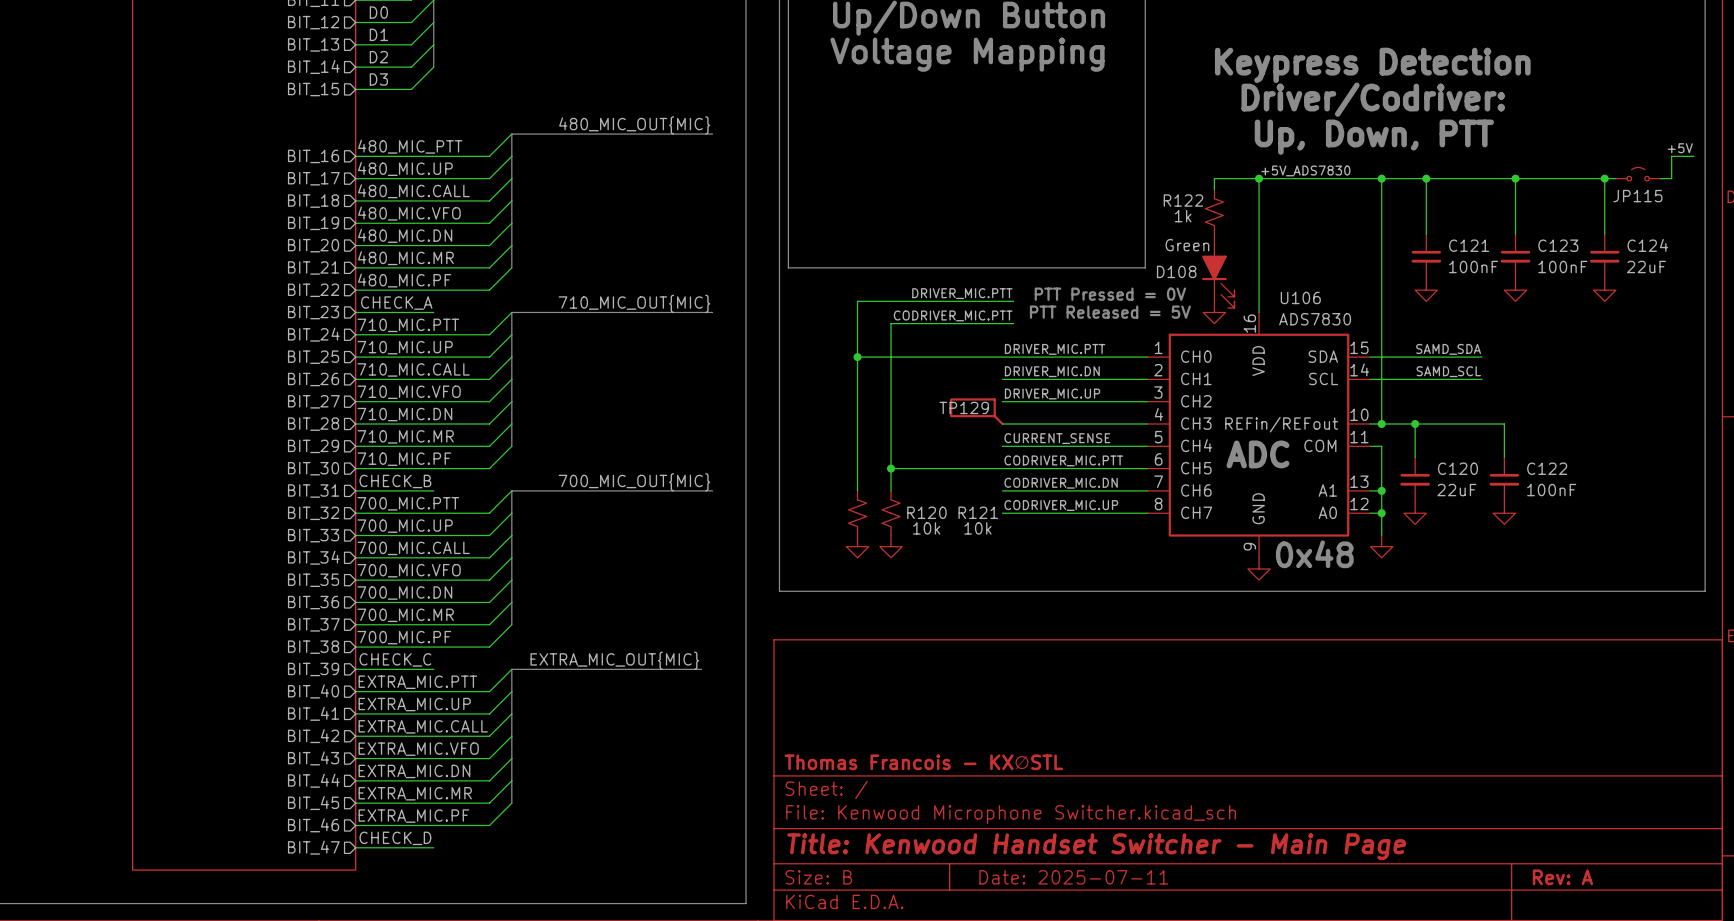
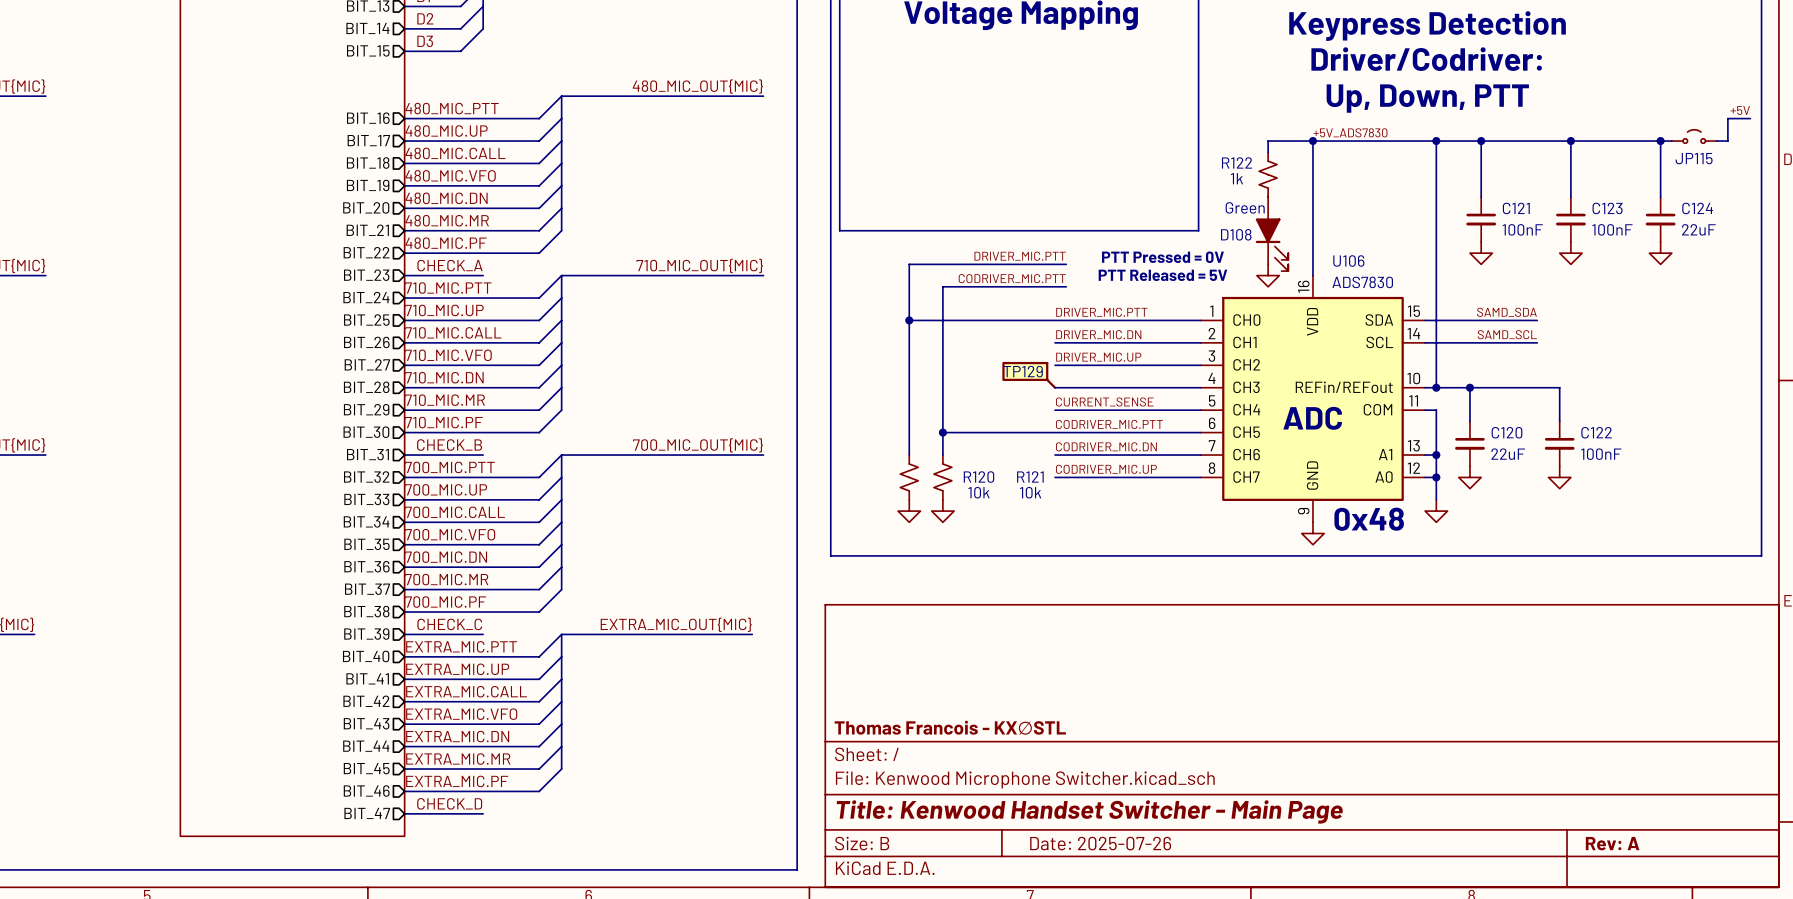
title block: Date: 2025-07-11 (1073, 877) -> Date: 2025-07-26 (1100, 843)

